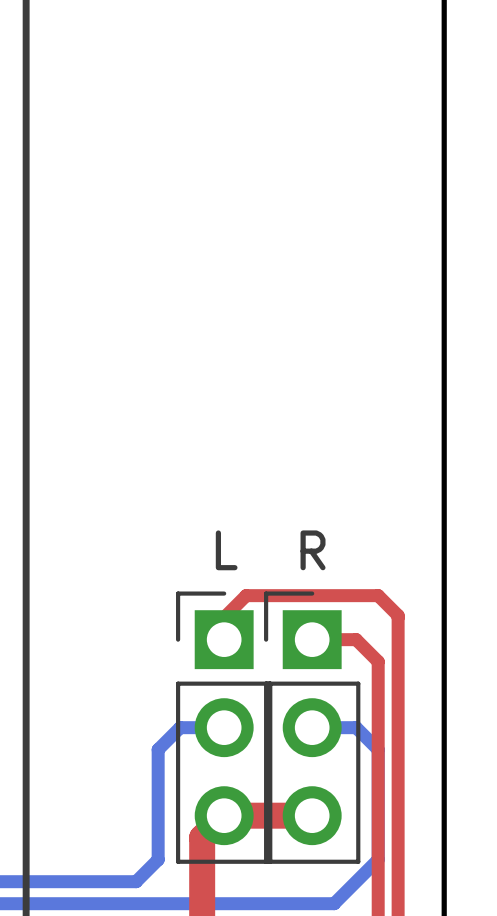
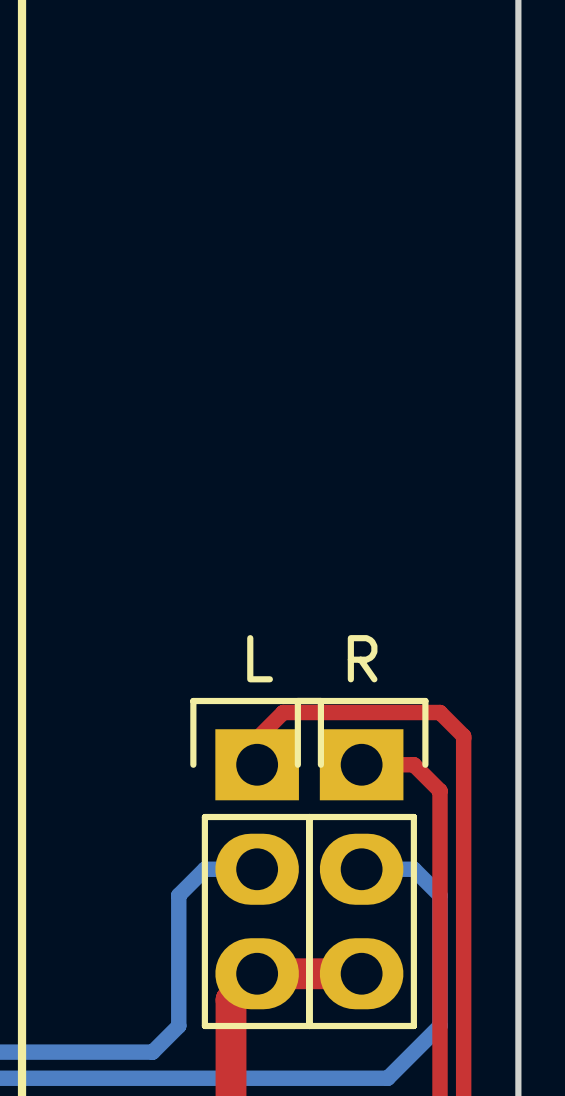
part footprint: [176, 591, 273, 864] -> [190, 697, 324, 1030]
part footprint: [264, 591, 361, 864] -> [294, 697, 429, 1030]

